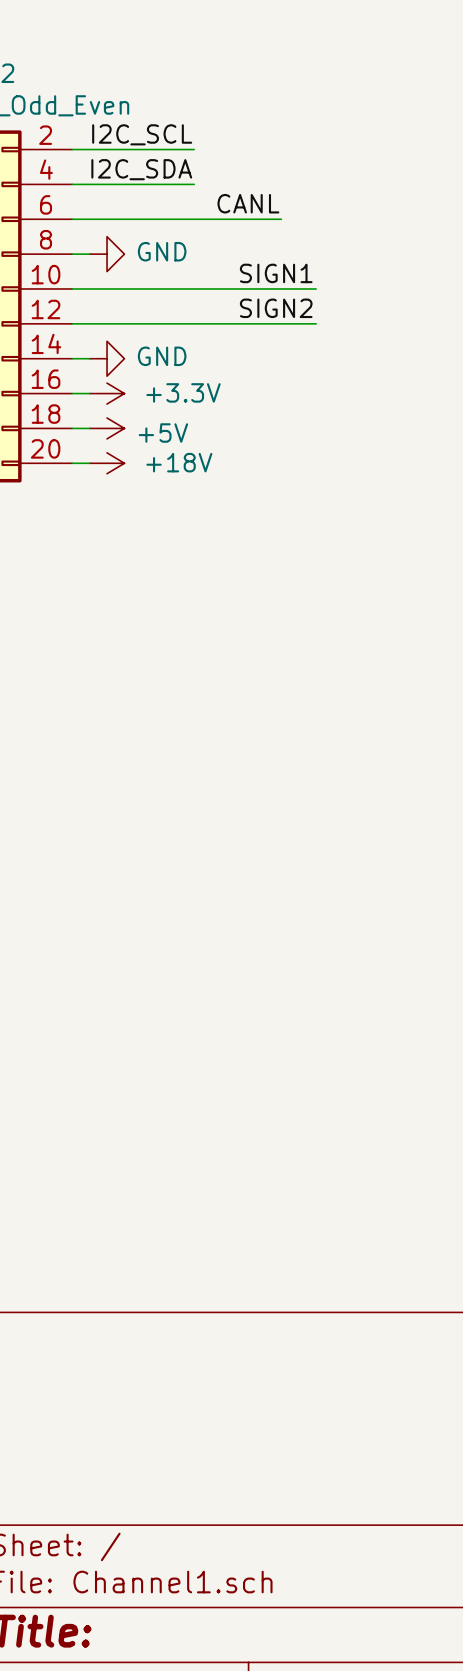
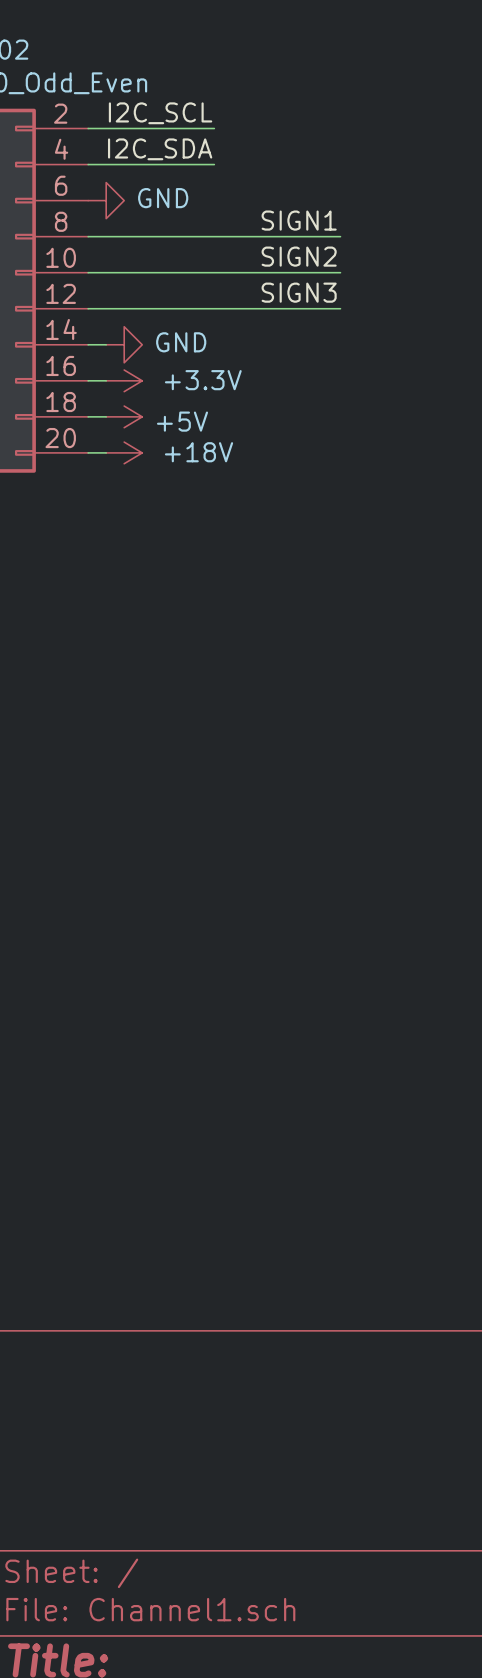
label: CANL (248, 203) -> none
wire: (72, 219) (281, 219) -> none
label: none -> SIGN1 (299, 220)
wire: none -> (106, 236) (340, 236)
power symbol position: GND (107, 254) -> GND (106, 200)
label: SIGN1 (276, 273) -> SIGN2 (299, 256)
label: SIGN2 (276, 308) -> SIGN3 (299, 292)

